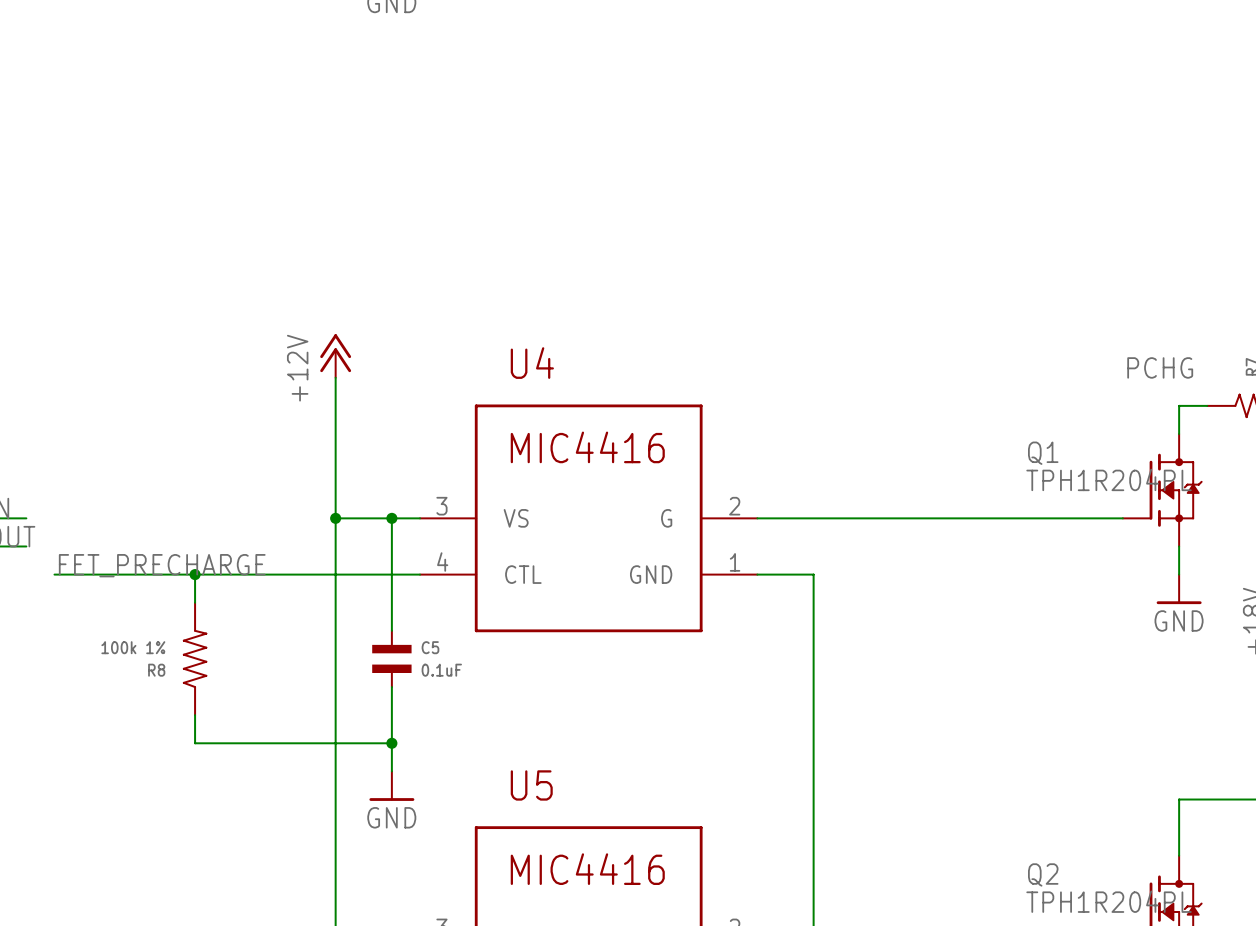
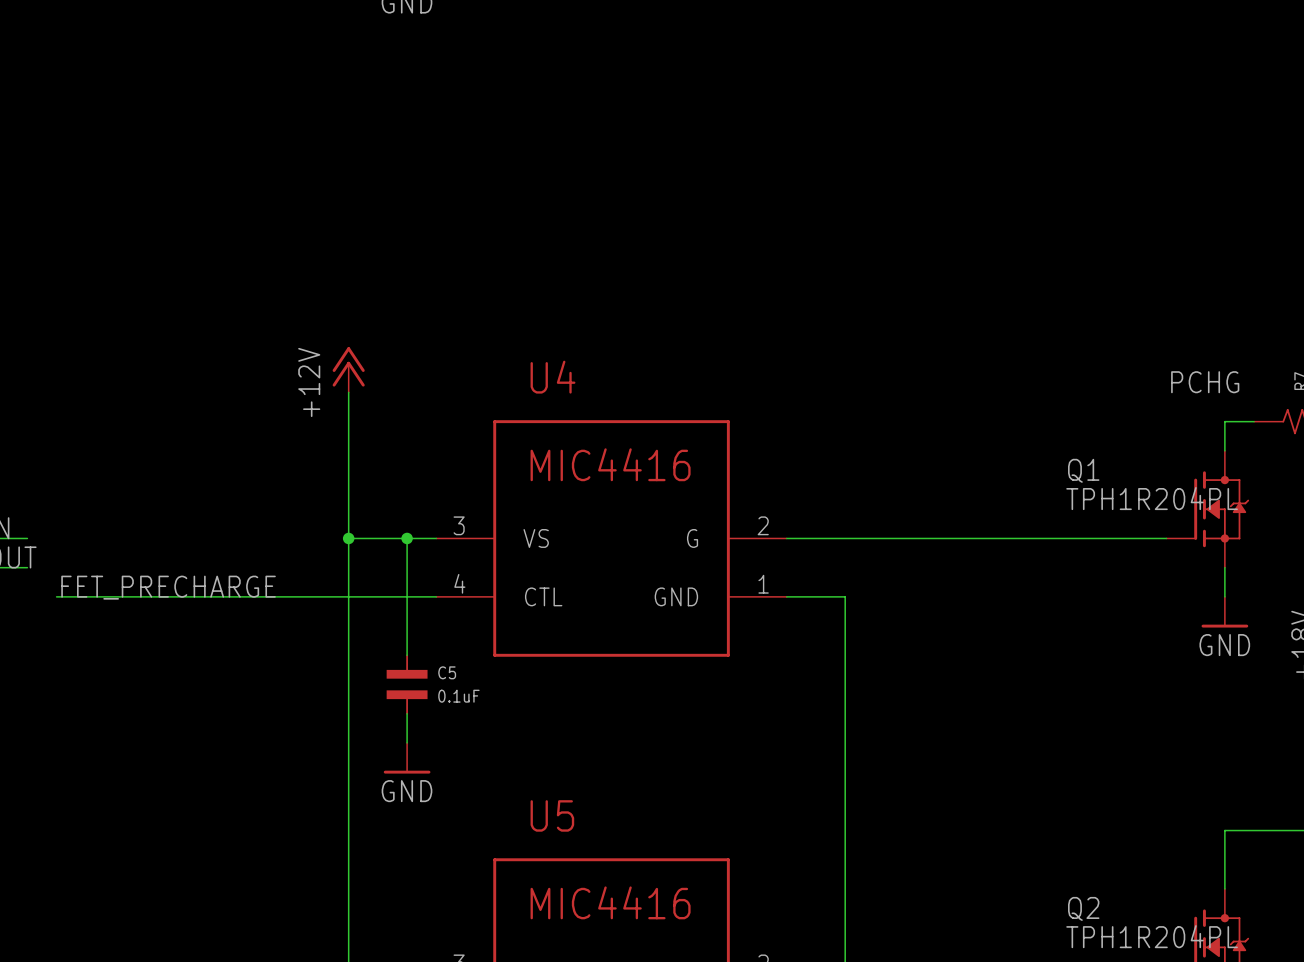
wire: (195, 574) (195, 602) -> none
junction: (195, 574) -> none
R8: 100k 1% (195, 658) -> none
wire: (195, 715) (195, 743) (391, 743) -> none
junction: (391, 743) -> none
power symbol position: GND (391, 786) -> GND (407, 758)

